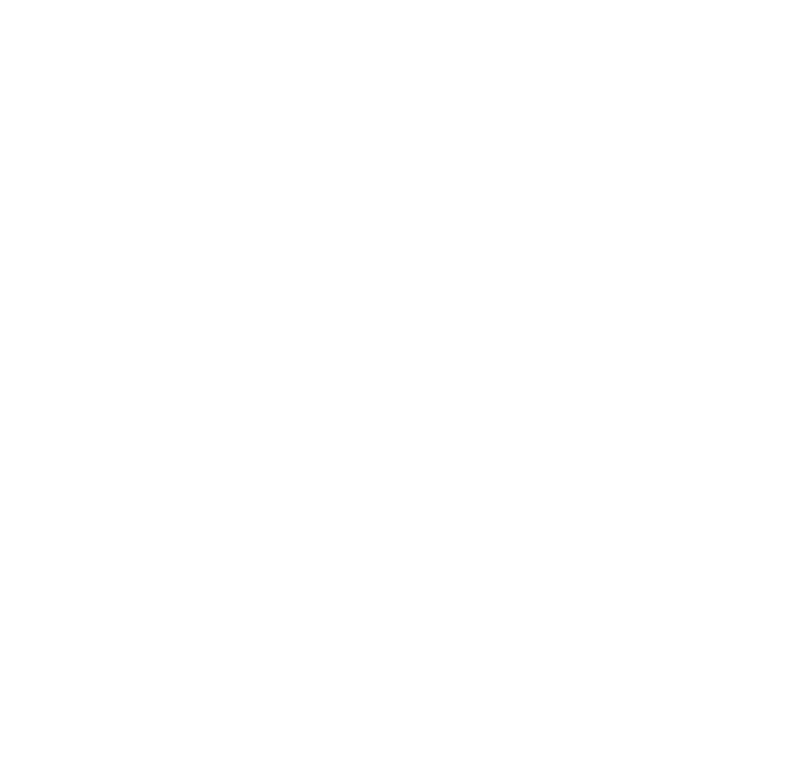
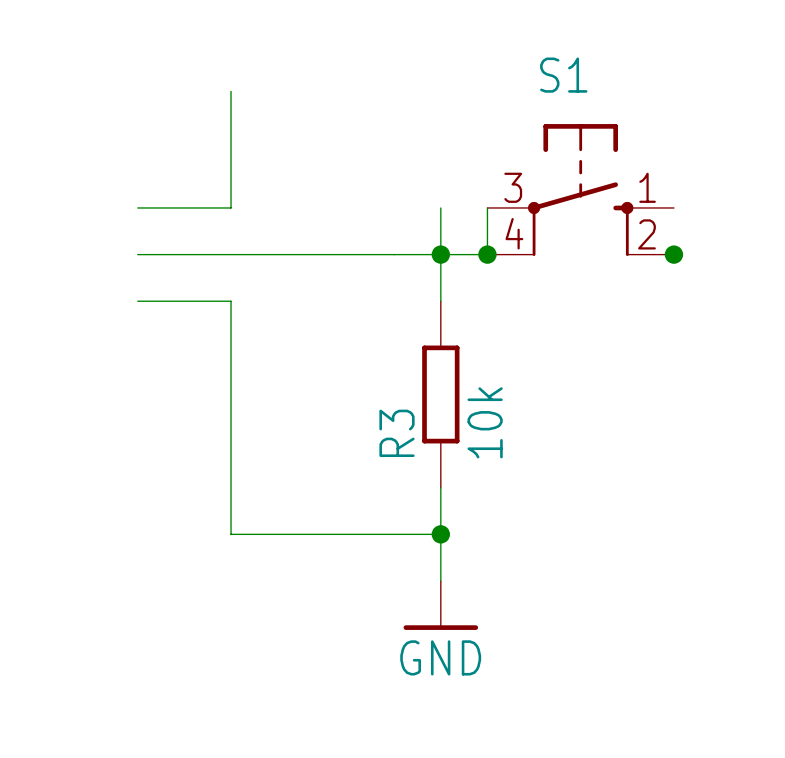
wire: none -> (231, 91) (231, 207) (137, 207)
S1: none -> (580, 190)
wire: none -> (440, 207) (440, 301)
wire: none -> (487, 207) (487, 254) (137, 254)
junction: none -> (440, 254)
junction: none -> (487, 254)
junction: none -> (673, 254)
wire: none -> (137, 301) (231, 301) (231, 534) (440, 534)
R3: none -> 10k (440, 394)
wire: none -> (440, 487) (440, 580)
junction: none -> (440, 534)
power symbol: none -> GND (440, 605)

